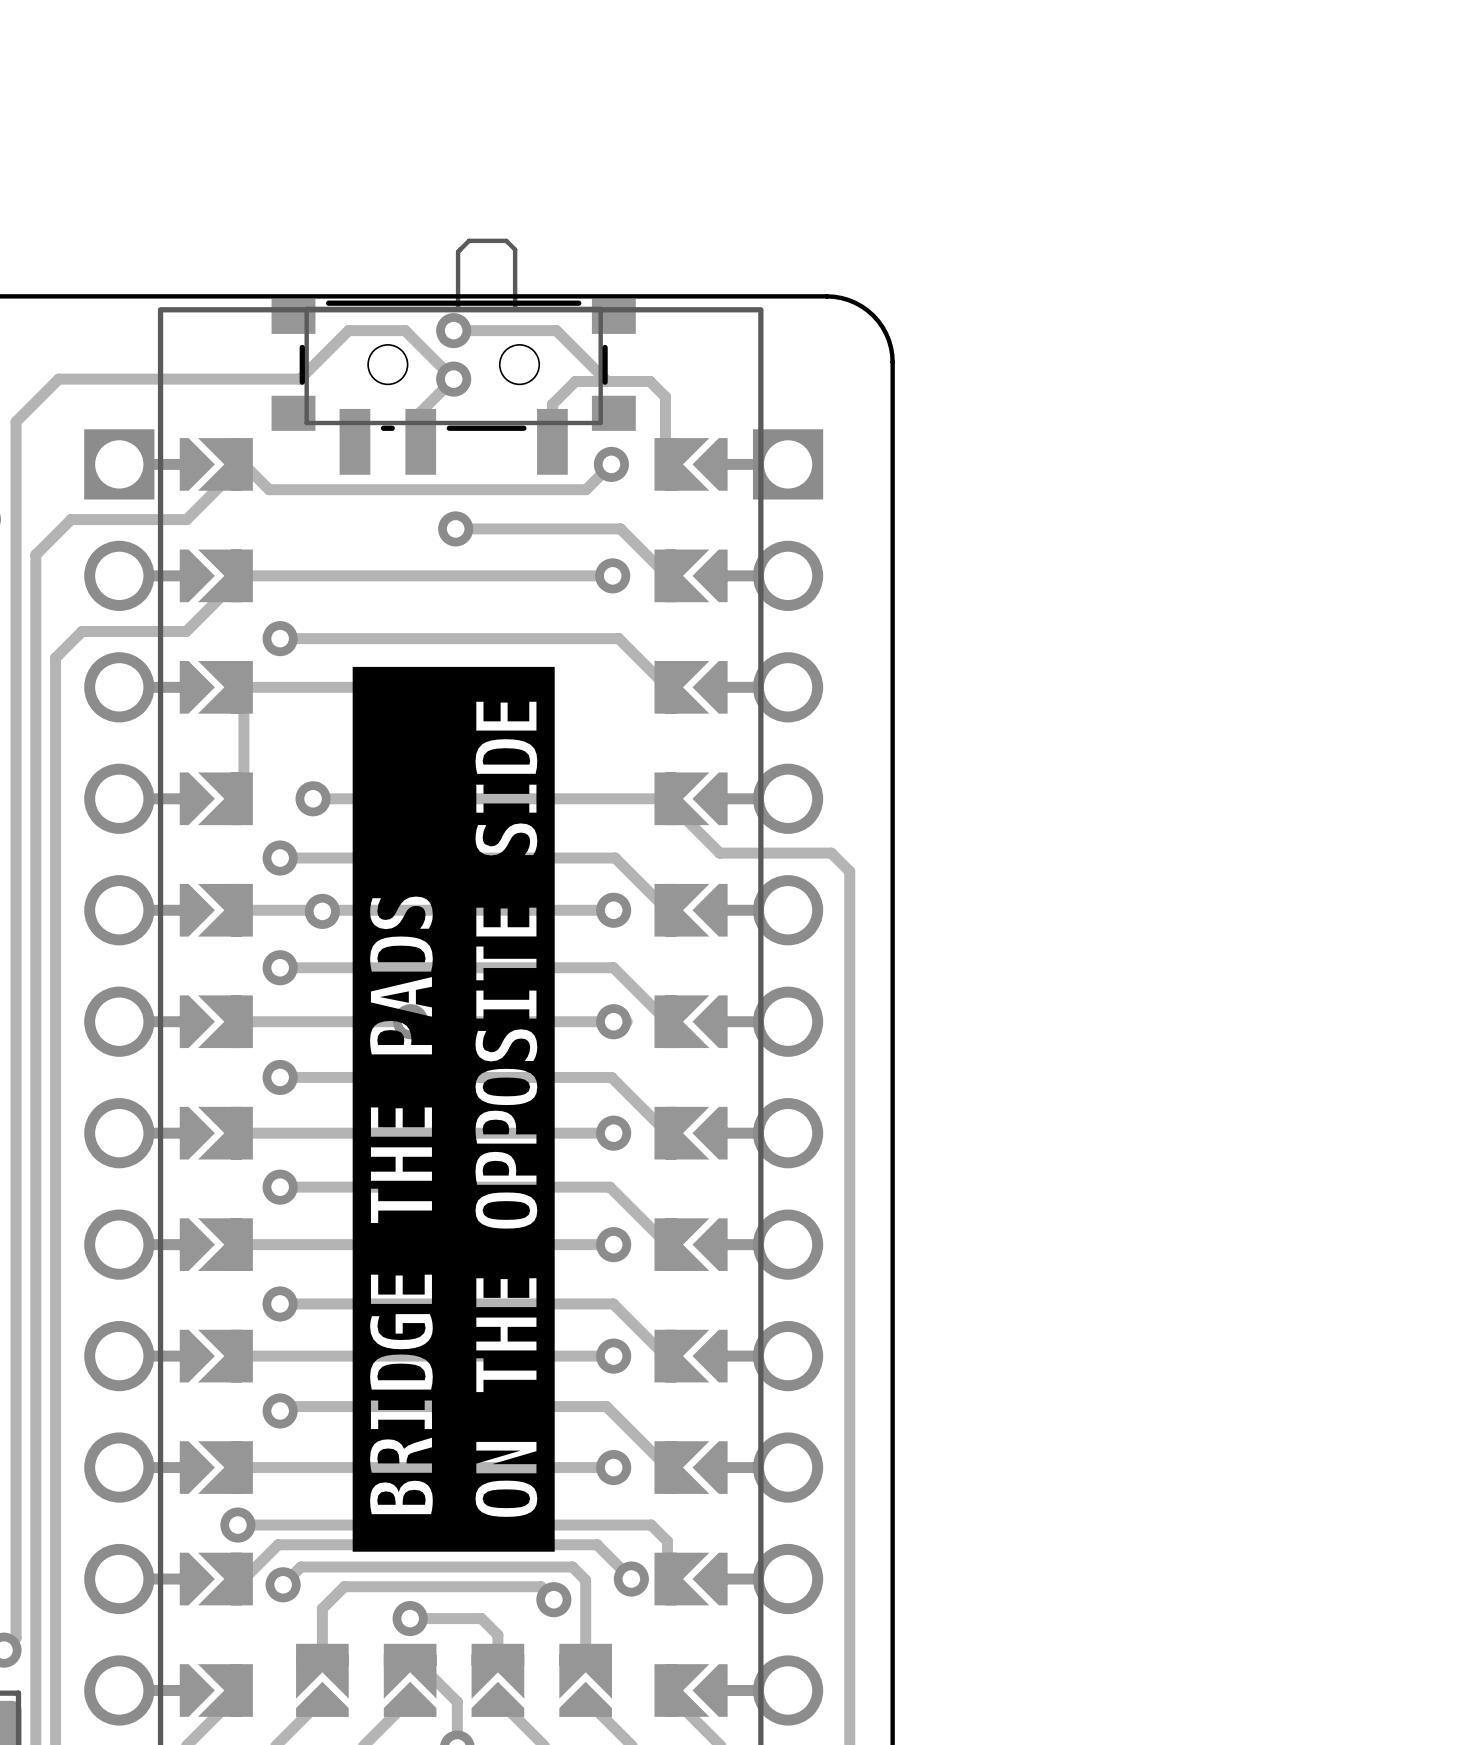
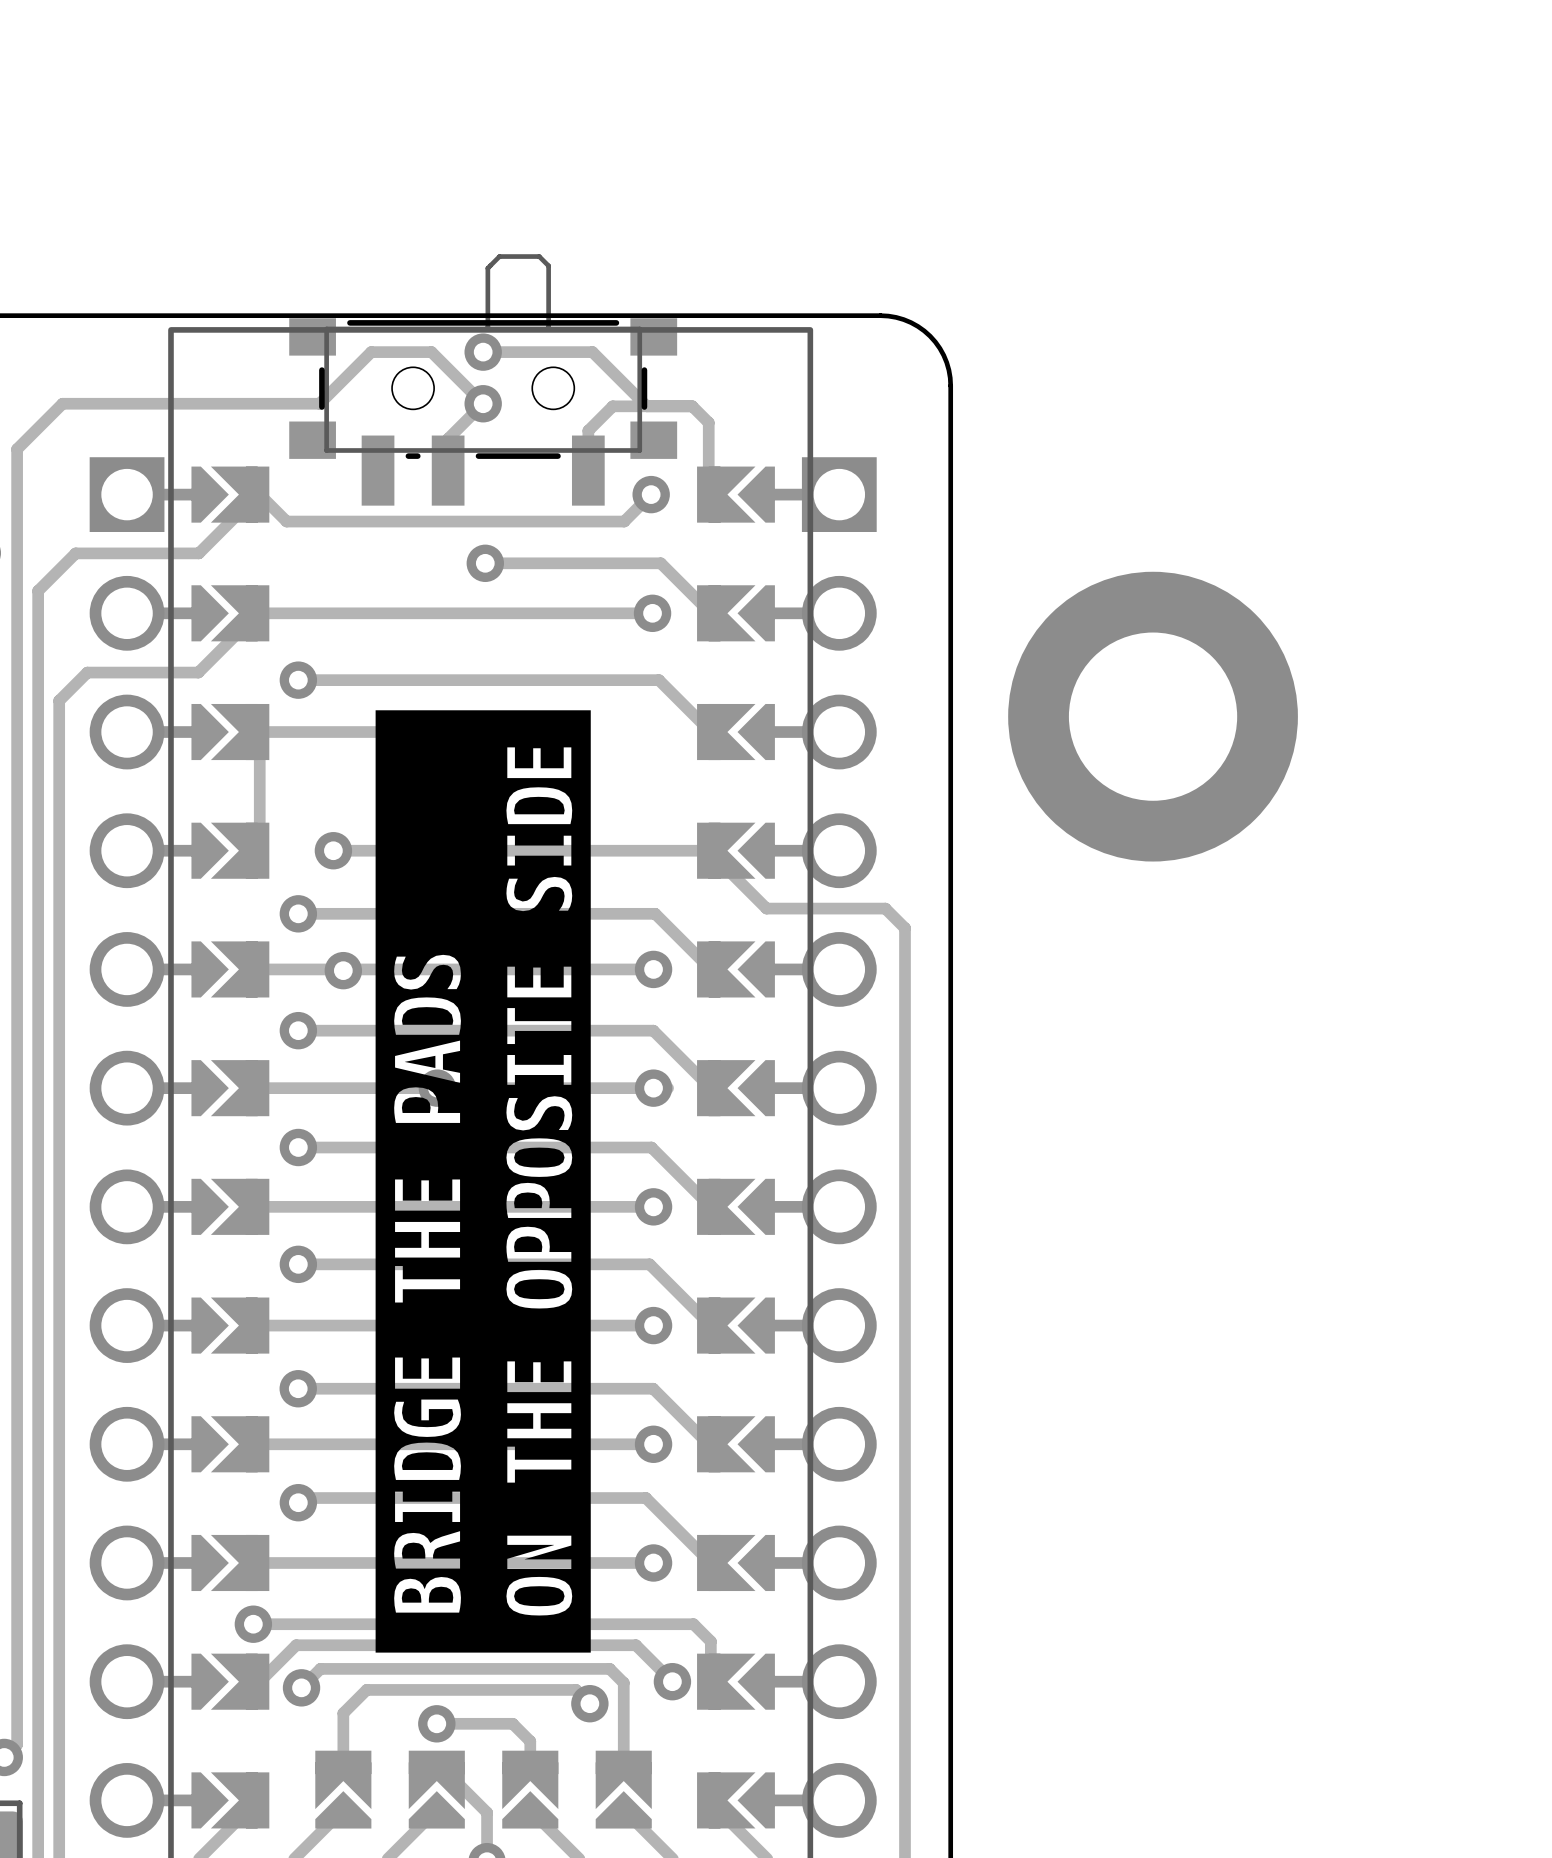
part: none -> (1153, 716)

